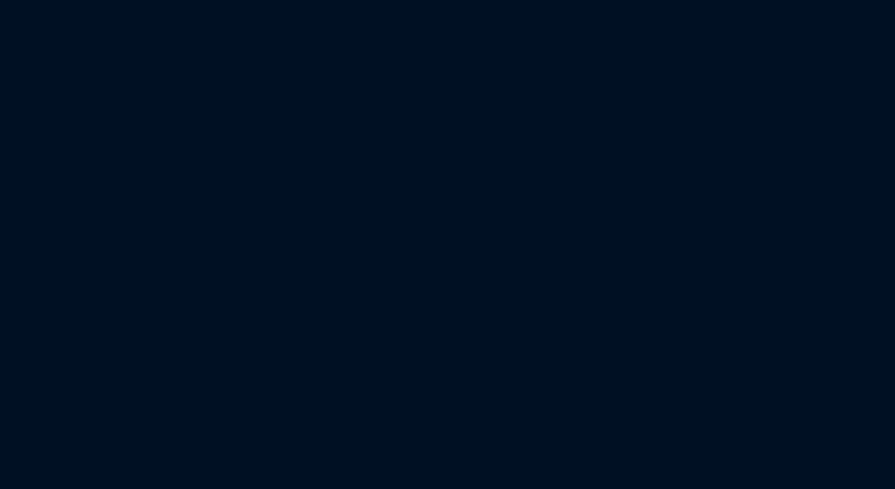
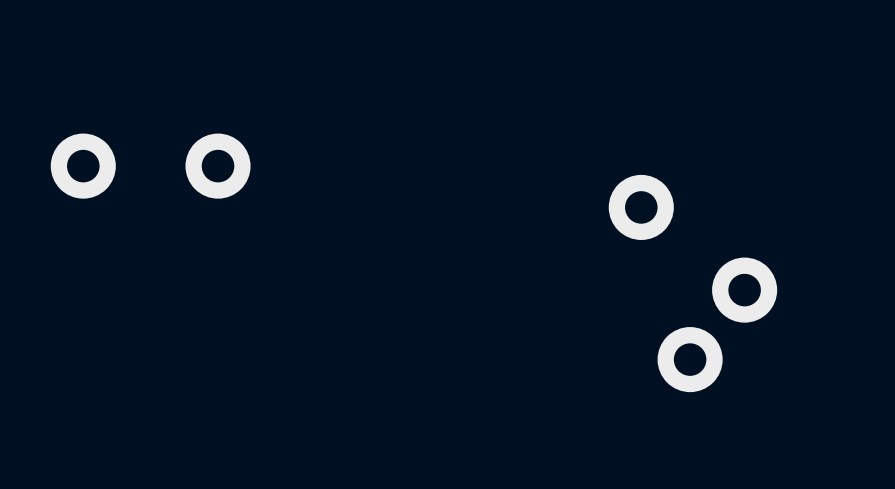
via: none -> (83, 166)
via: none -> (218, 166)
via: none -> (641, 207)
via: none -> (744, 290)
via: none -> (690, 359)

